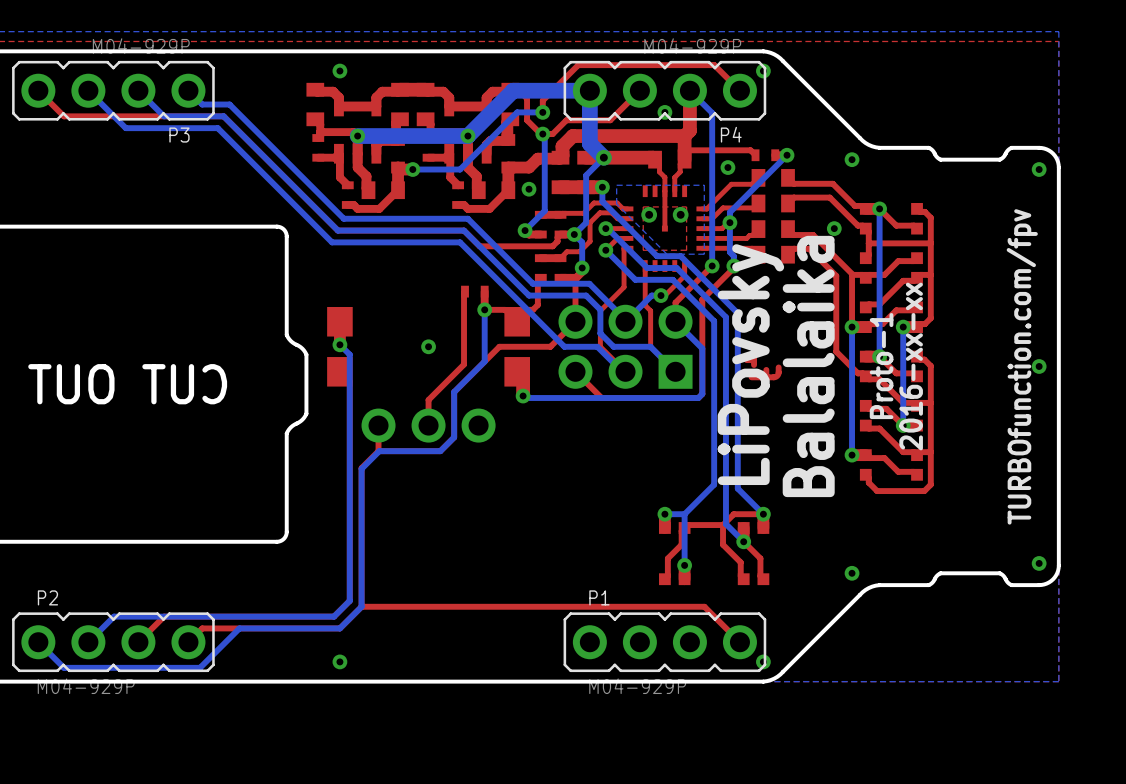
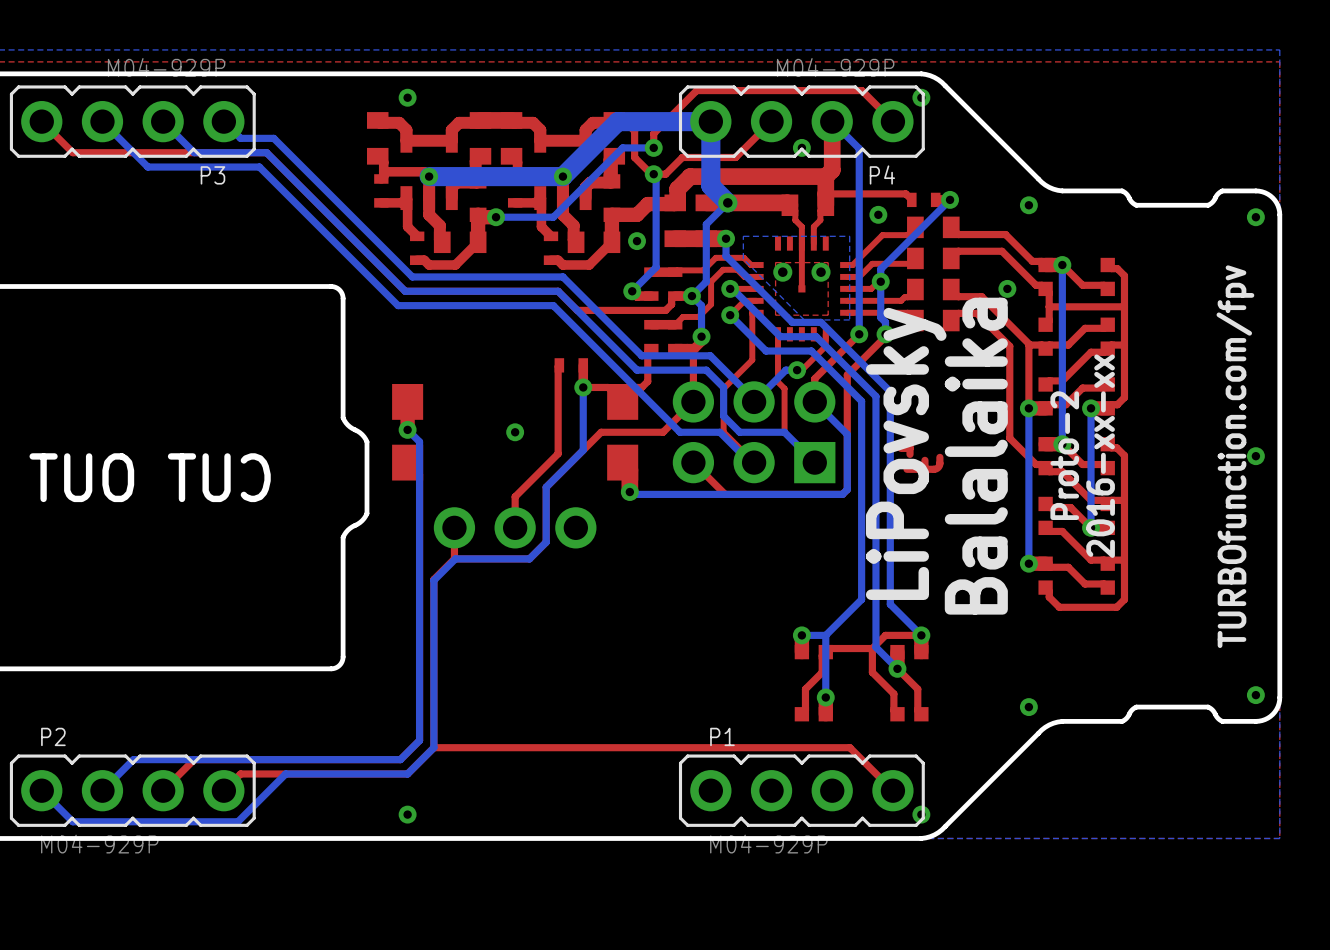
text: Proto-1 (881, 366) -> Proto-2 (1064, 455)

